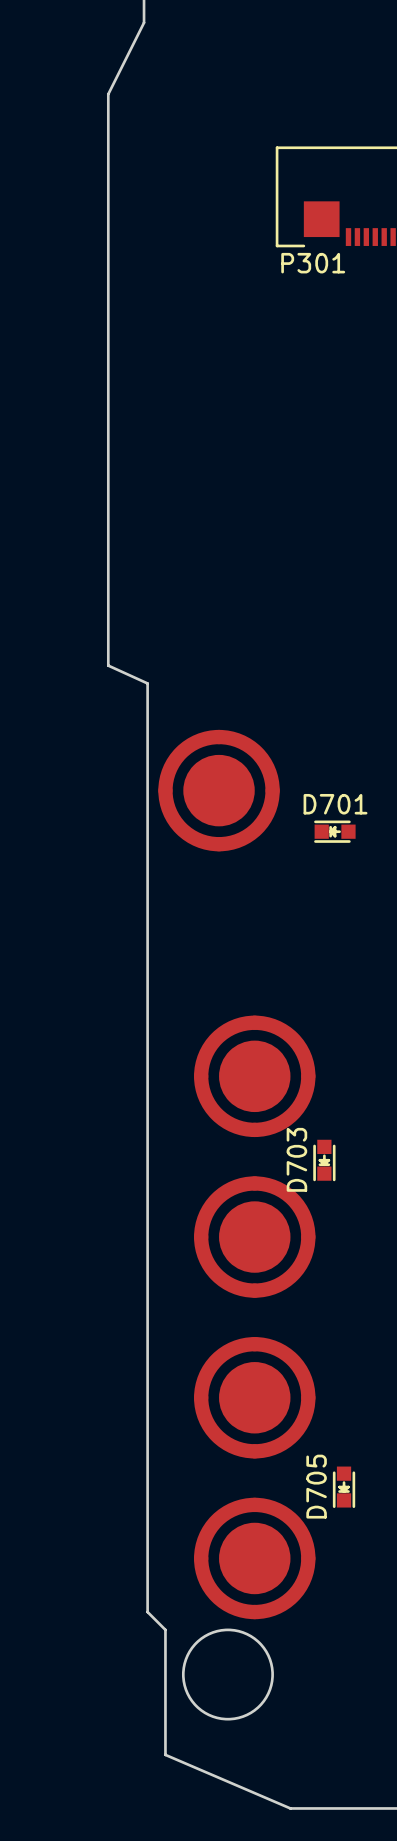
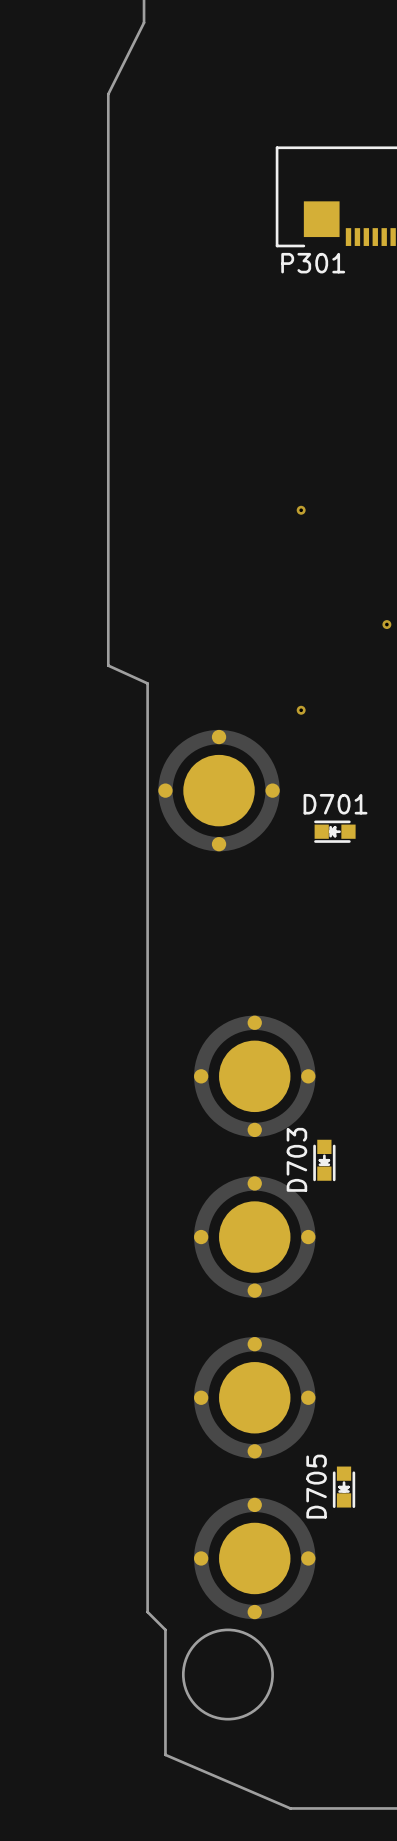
via: none -> (301, 510)
via: none -> (386, 624)
via: none -> (301, 710)

